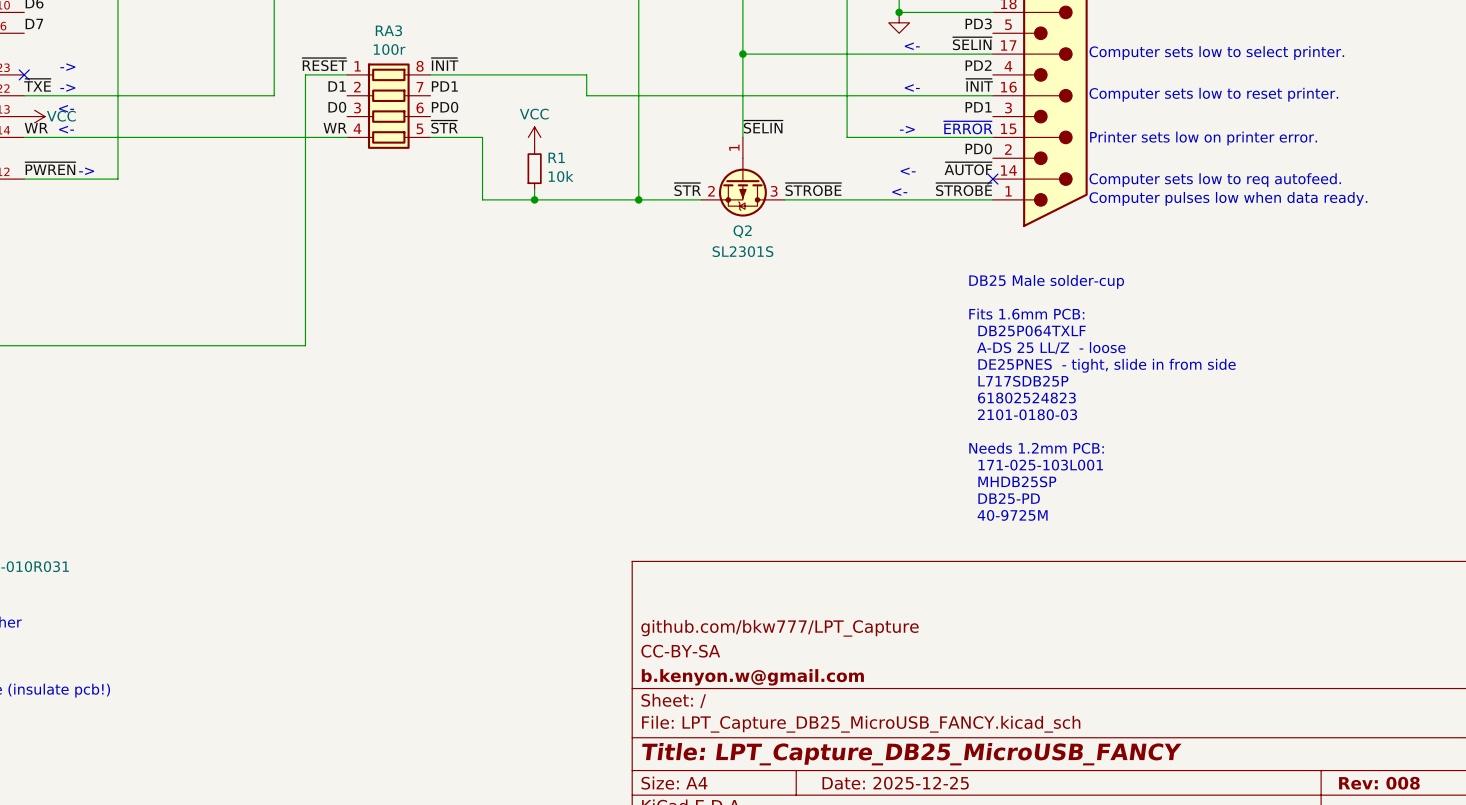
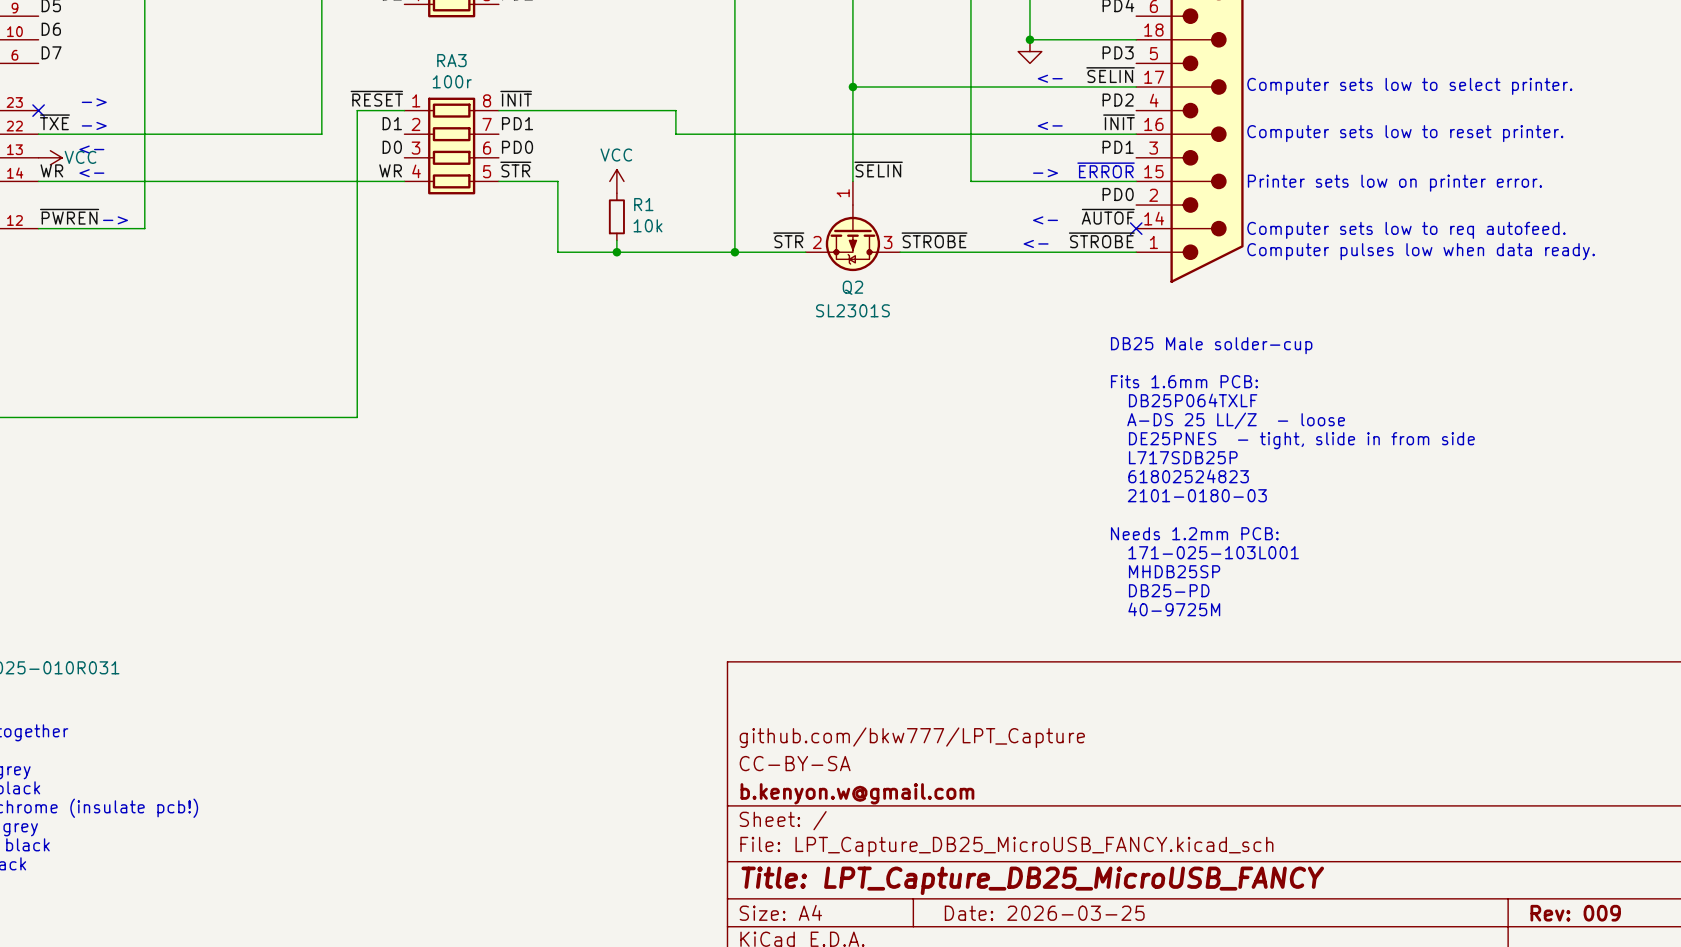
title block: Date: 2025-12-25 (895, 783) -> Date: 2026-03-25 (1044, 913)
title block: Rev: 008 (1379, 783) -> Rev: 009 (1575, 913)

